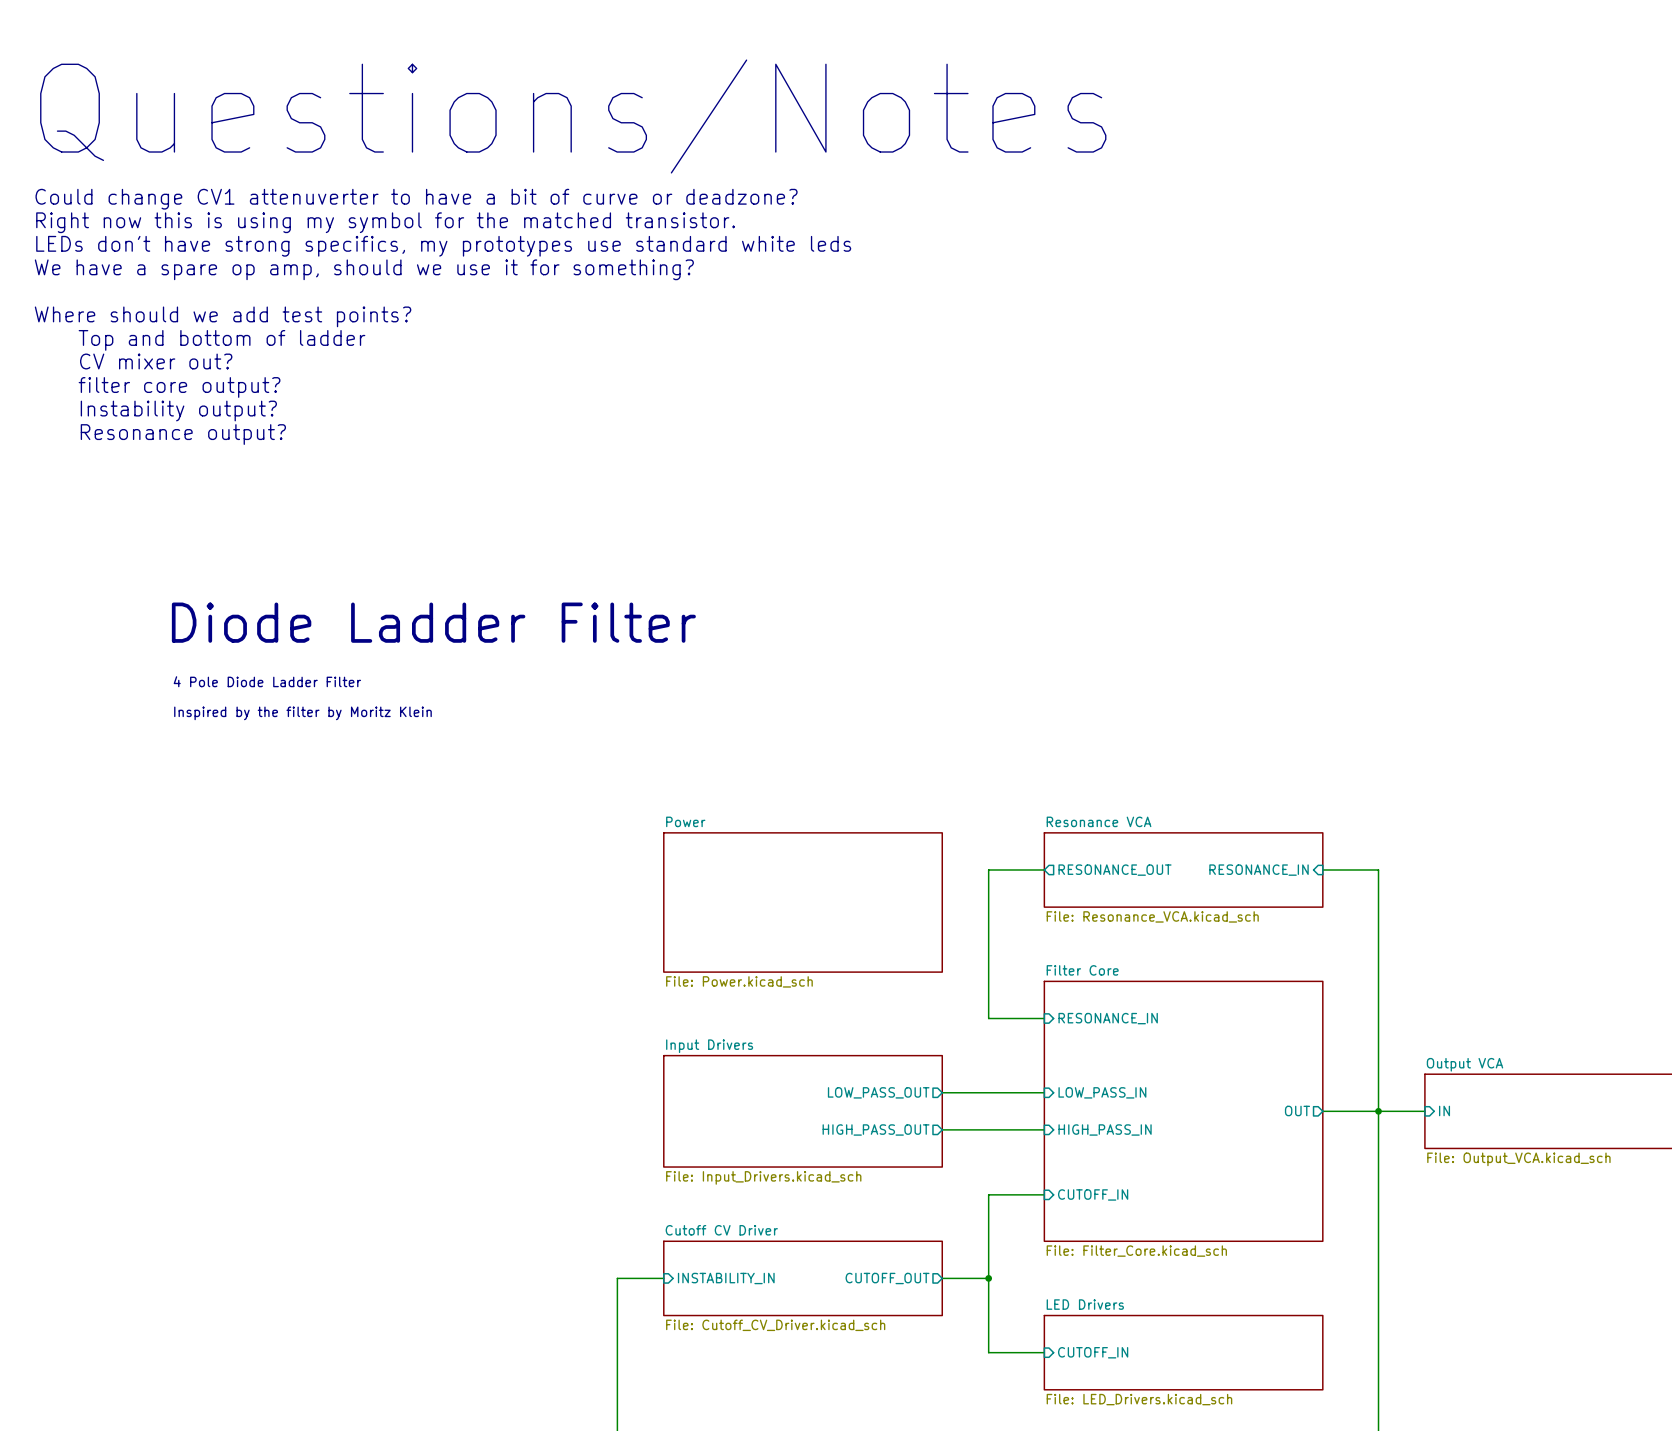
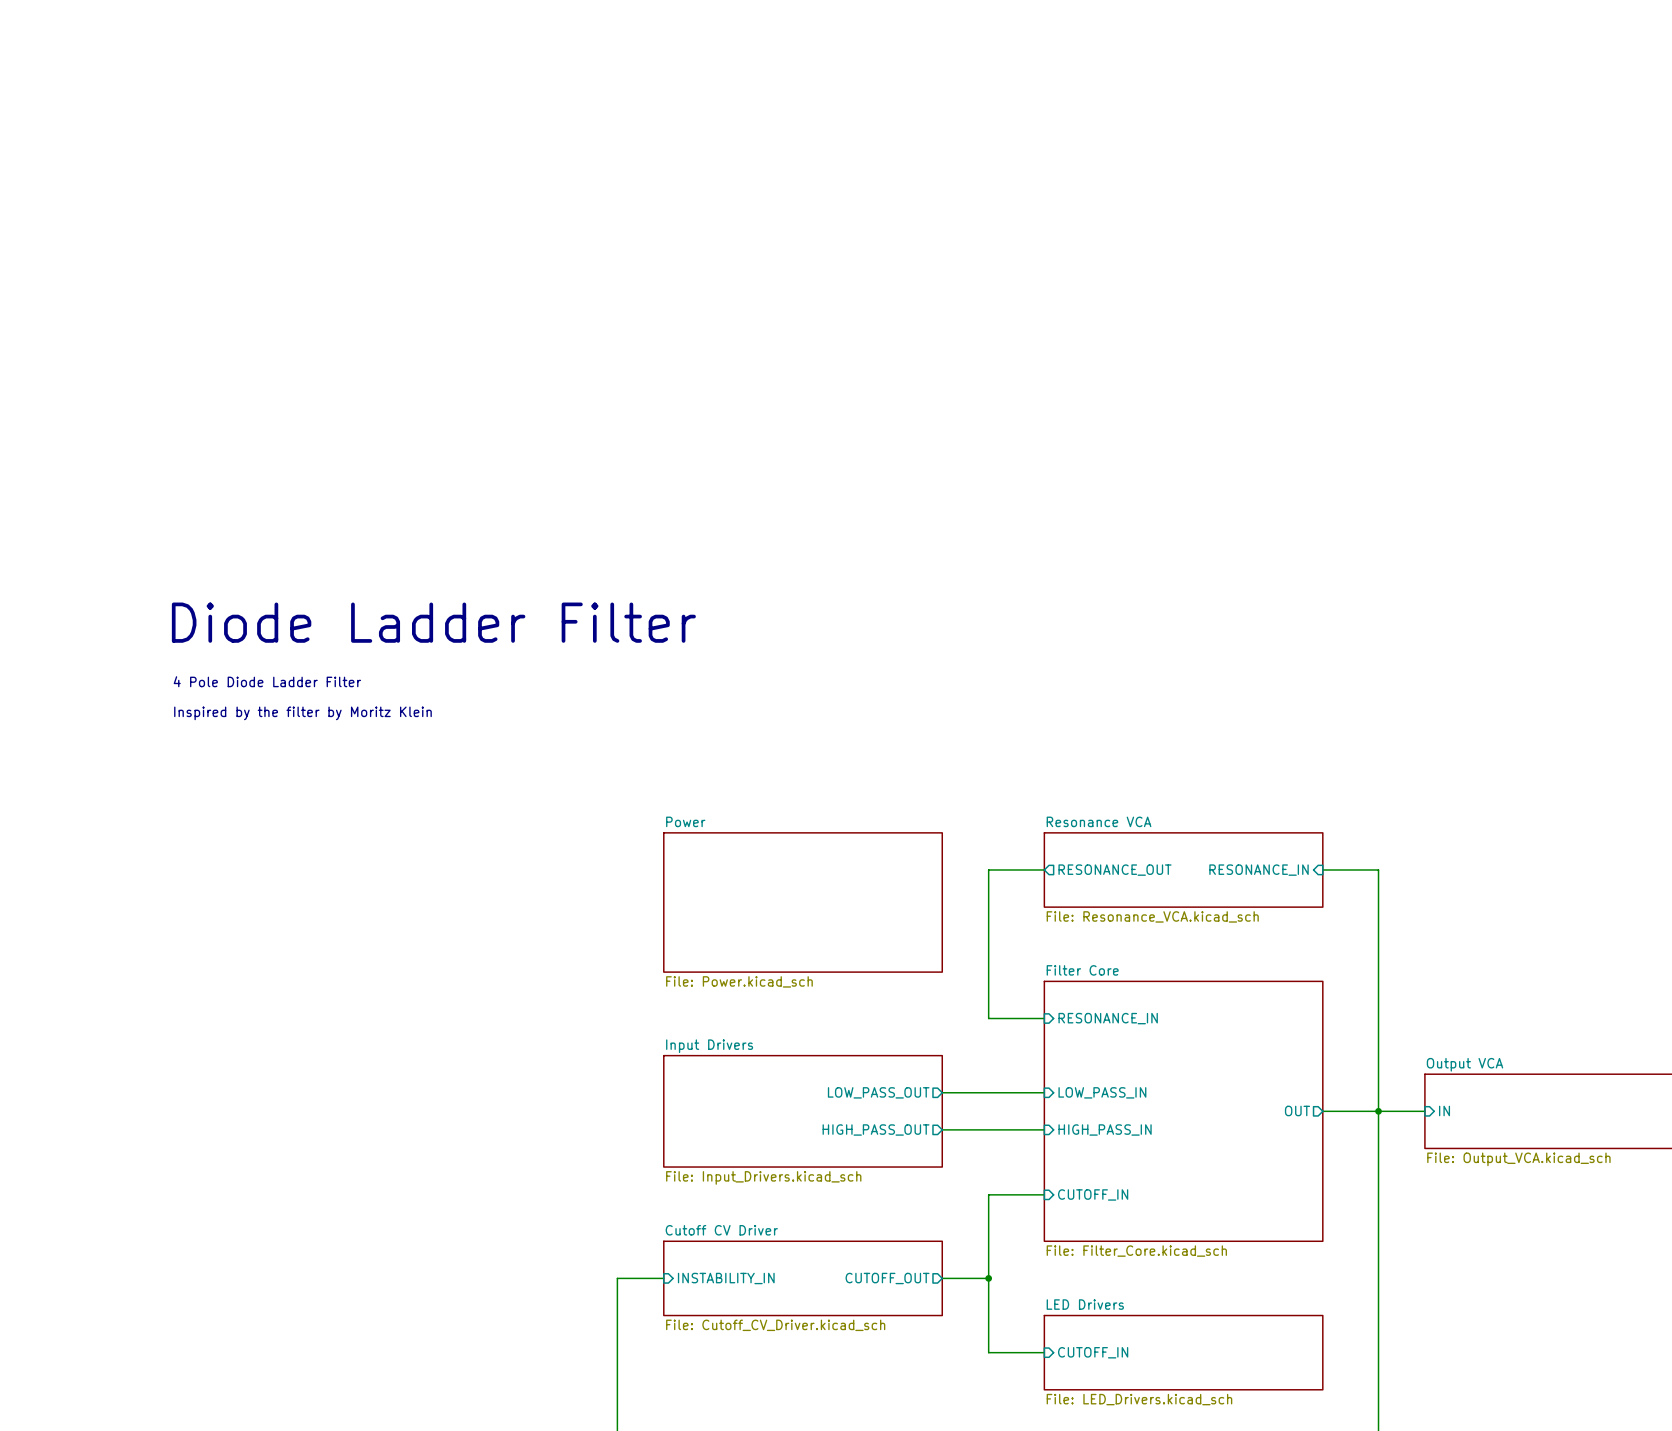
text: Questions/Notes (573, 116) -> none
text: Could change CV1 attenuverter to have a bit of curve or deadzone? (416, 199) -> none
text: Right now this is using my symbol for the matched transistor. (385, 222) -> none
text: LEDs don't have strong specifics, my prototypes use standard white leds (443, 246) -> none
text: We have a spare op amp, should we use it for something? (364, 269) -> none
text: Where should we add test points? (223, 316) -> none
text: Top and bottom of ladder (221, 340) -> none
text: CV mixer out? (156, 361) -> none
text: filter core output? (179, 387) -> none
text: Instability output? (178, 411) -> none
text: Resonance output? (183, 434) -> none

